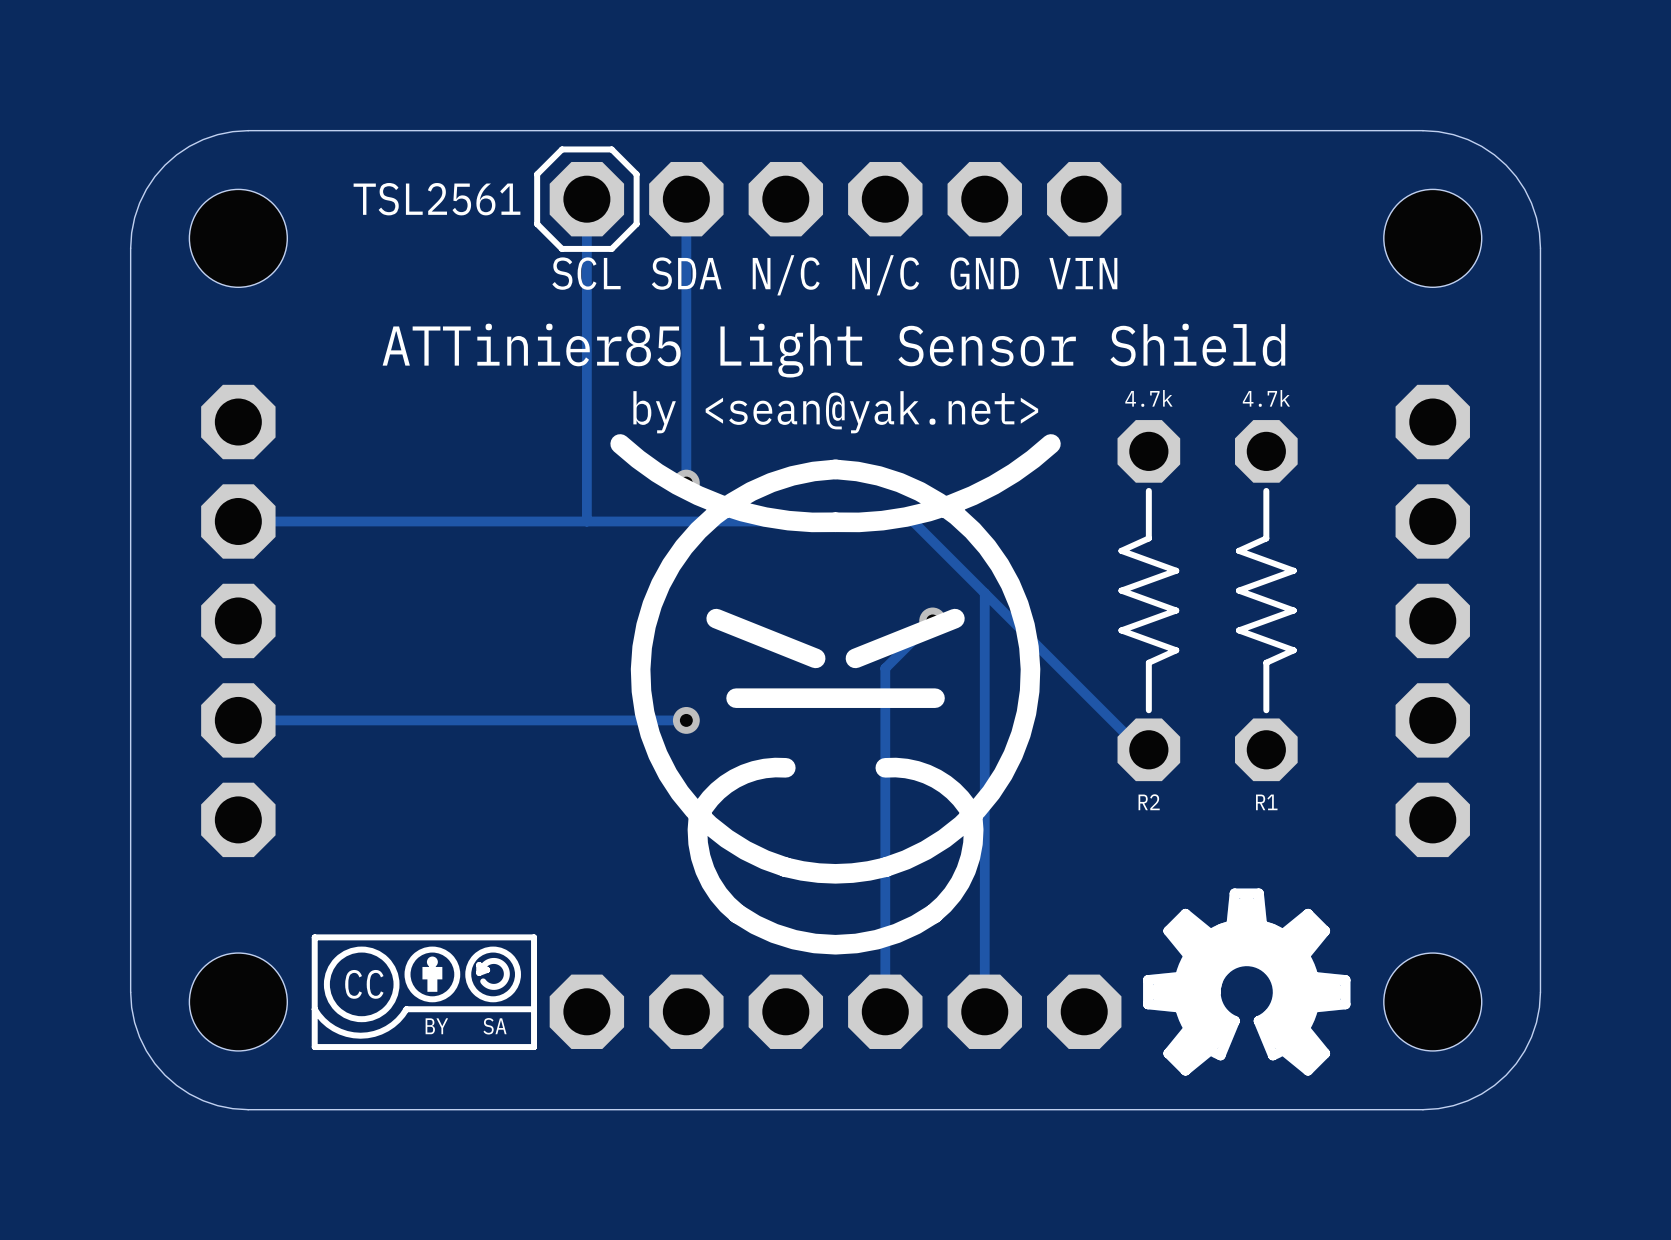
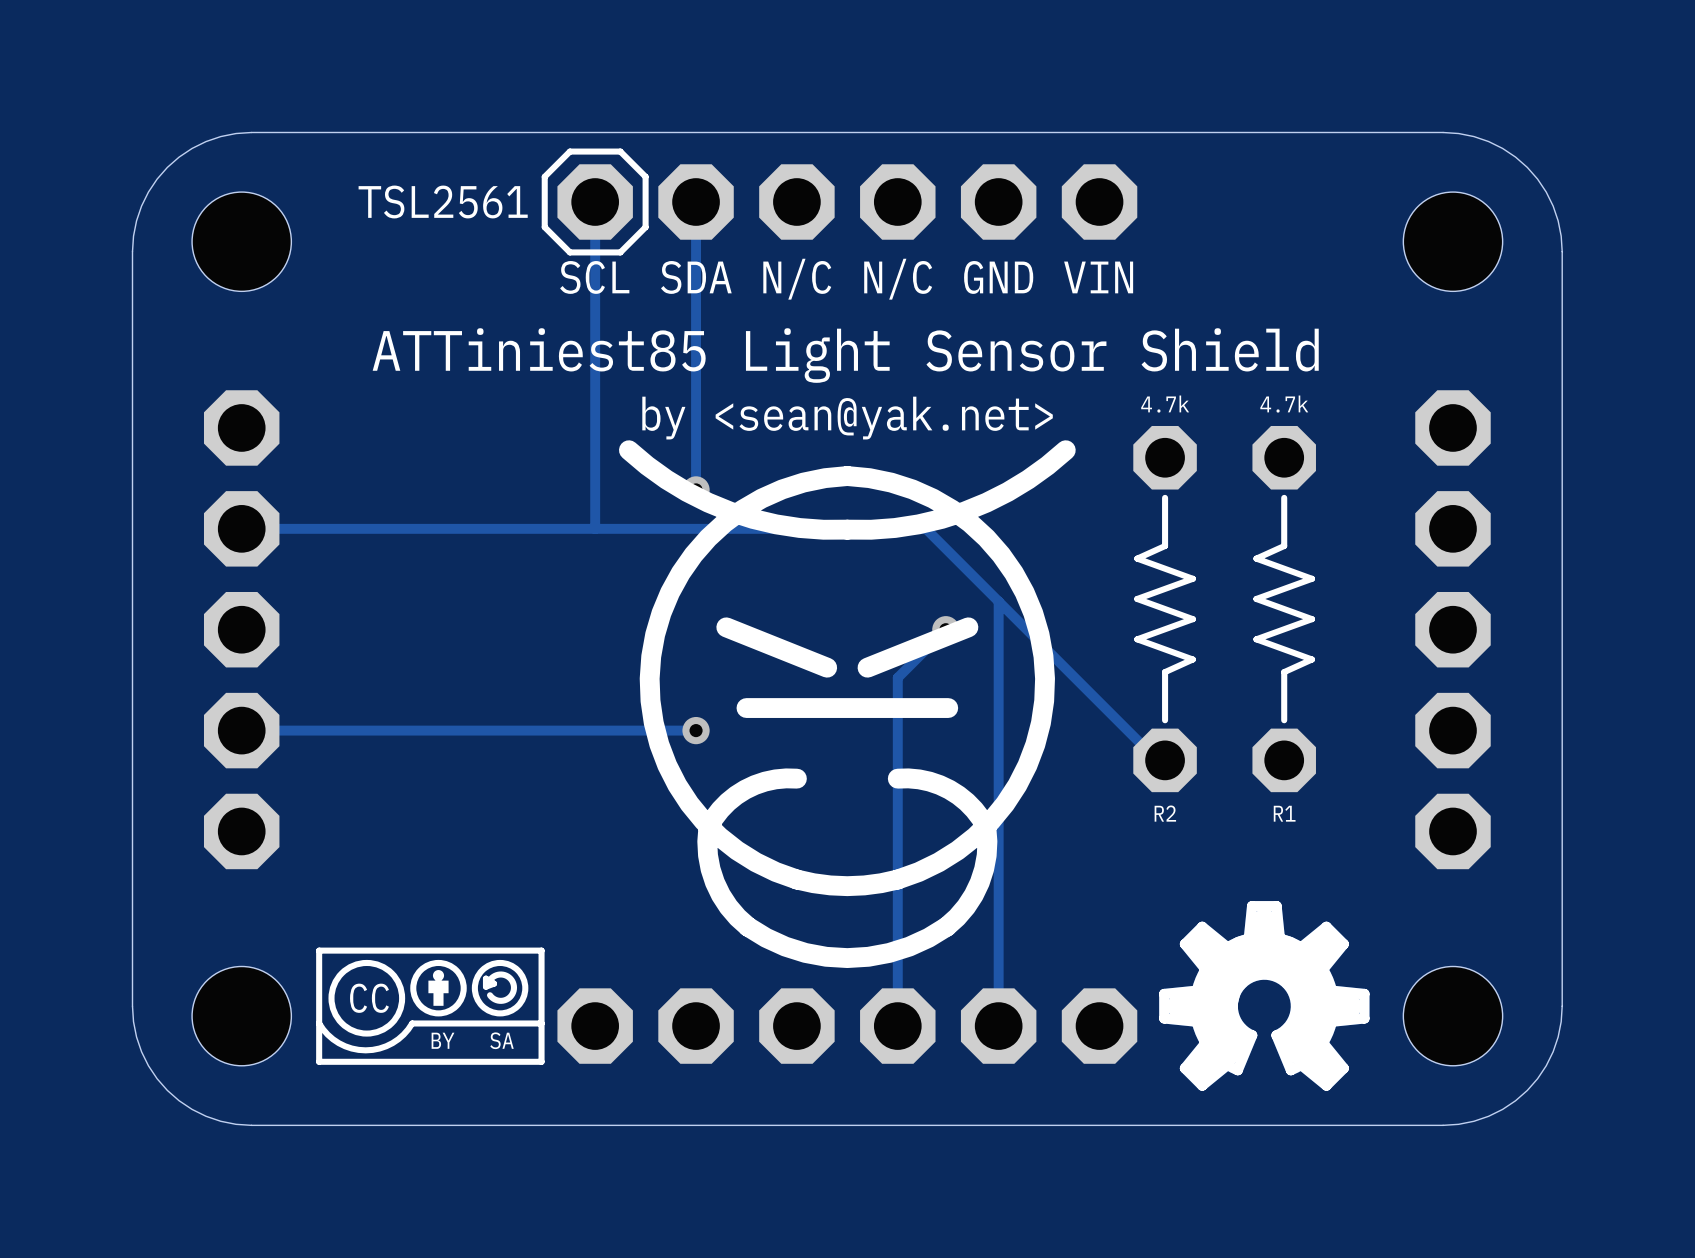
text: ATTinier85 Light Sensor Shield (833, 350) -> ATTiniest85 Light Sensor Shield (845, 355)

